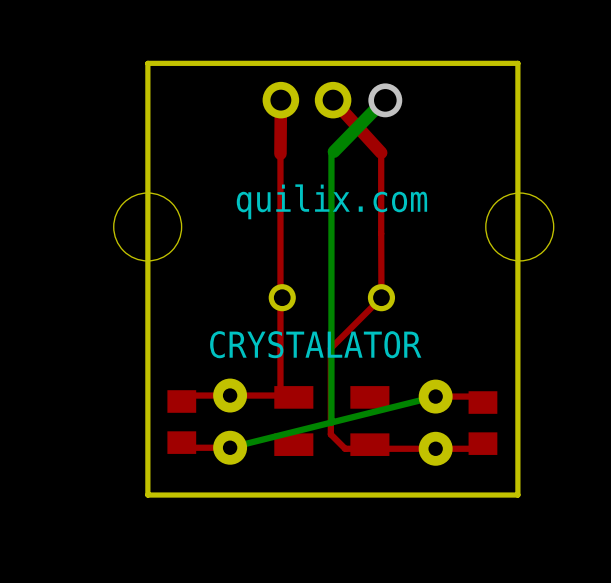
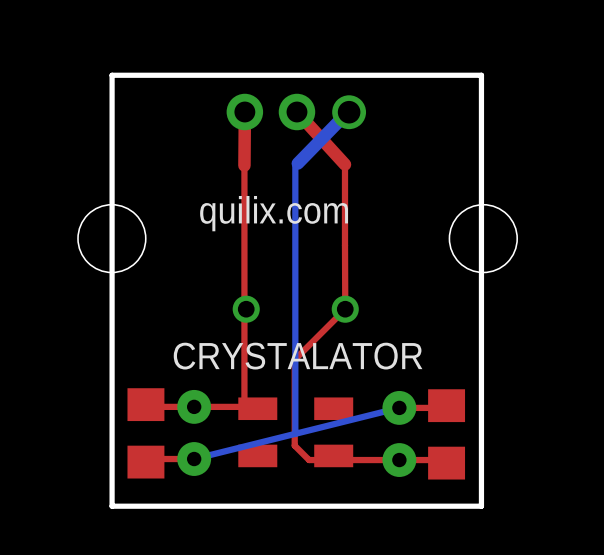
part footprint: [167, 390, 197, 454] -> [127, 388, 165, 479]
part footprint: [468, 391, 498, 455] -> [428, 389, 466, 480]

